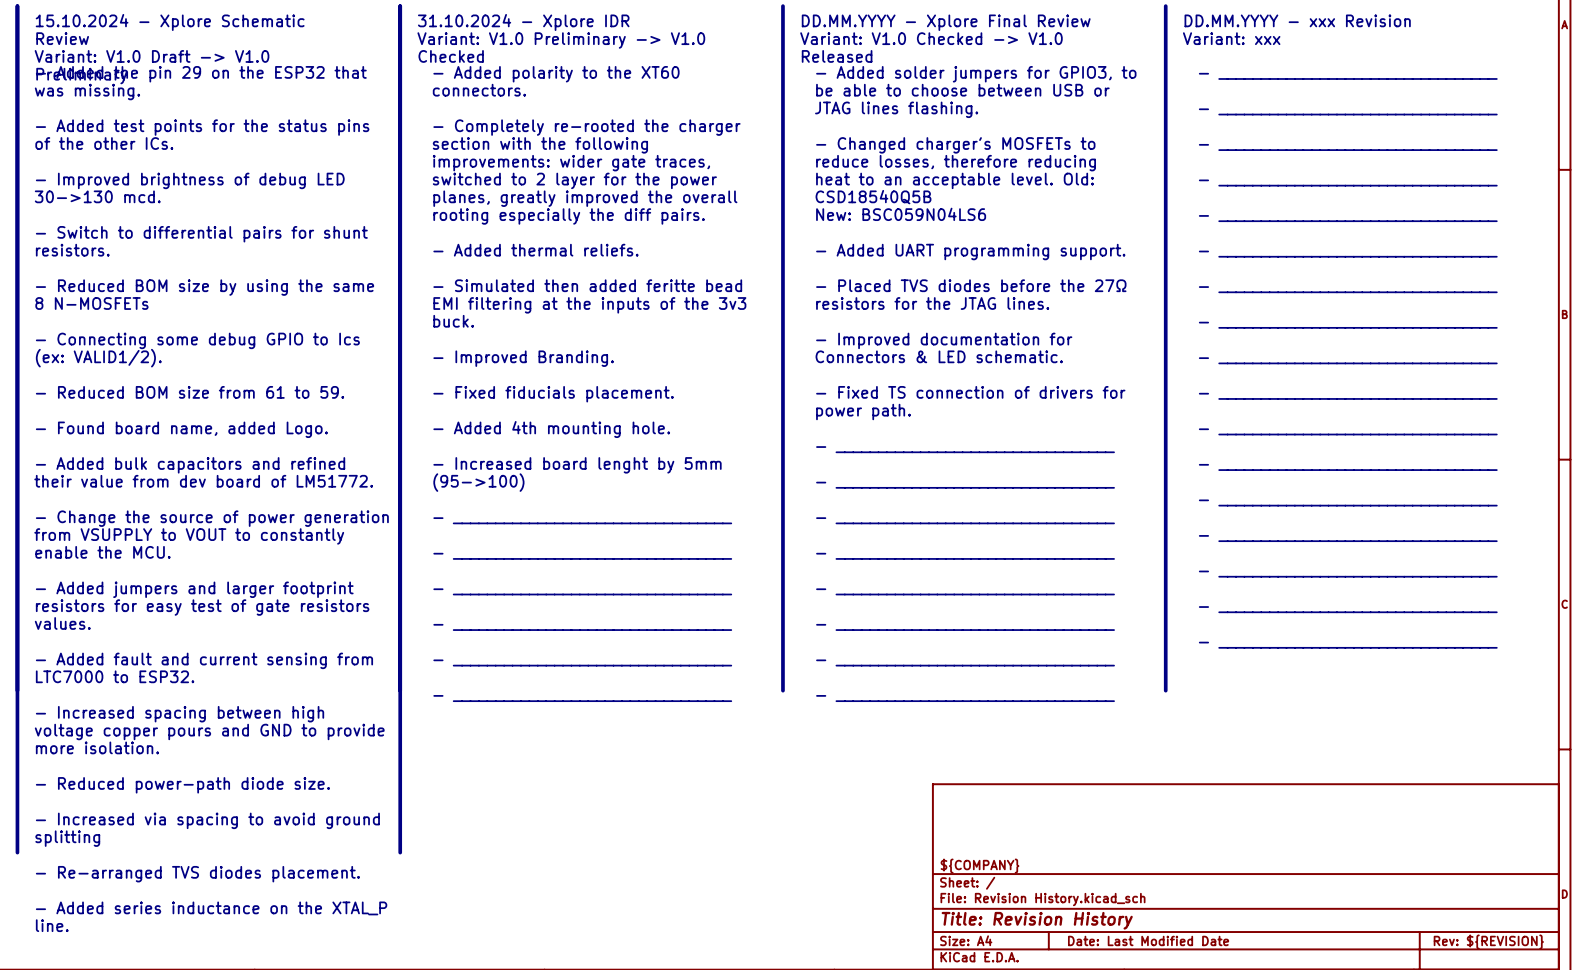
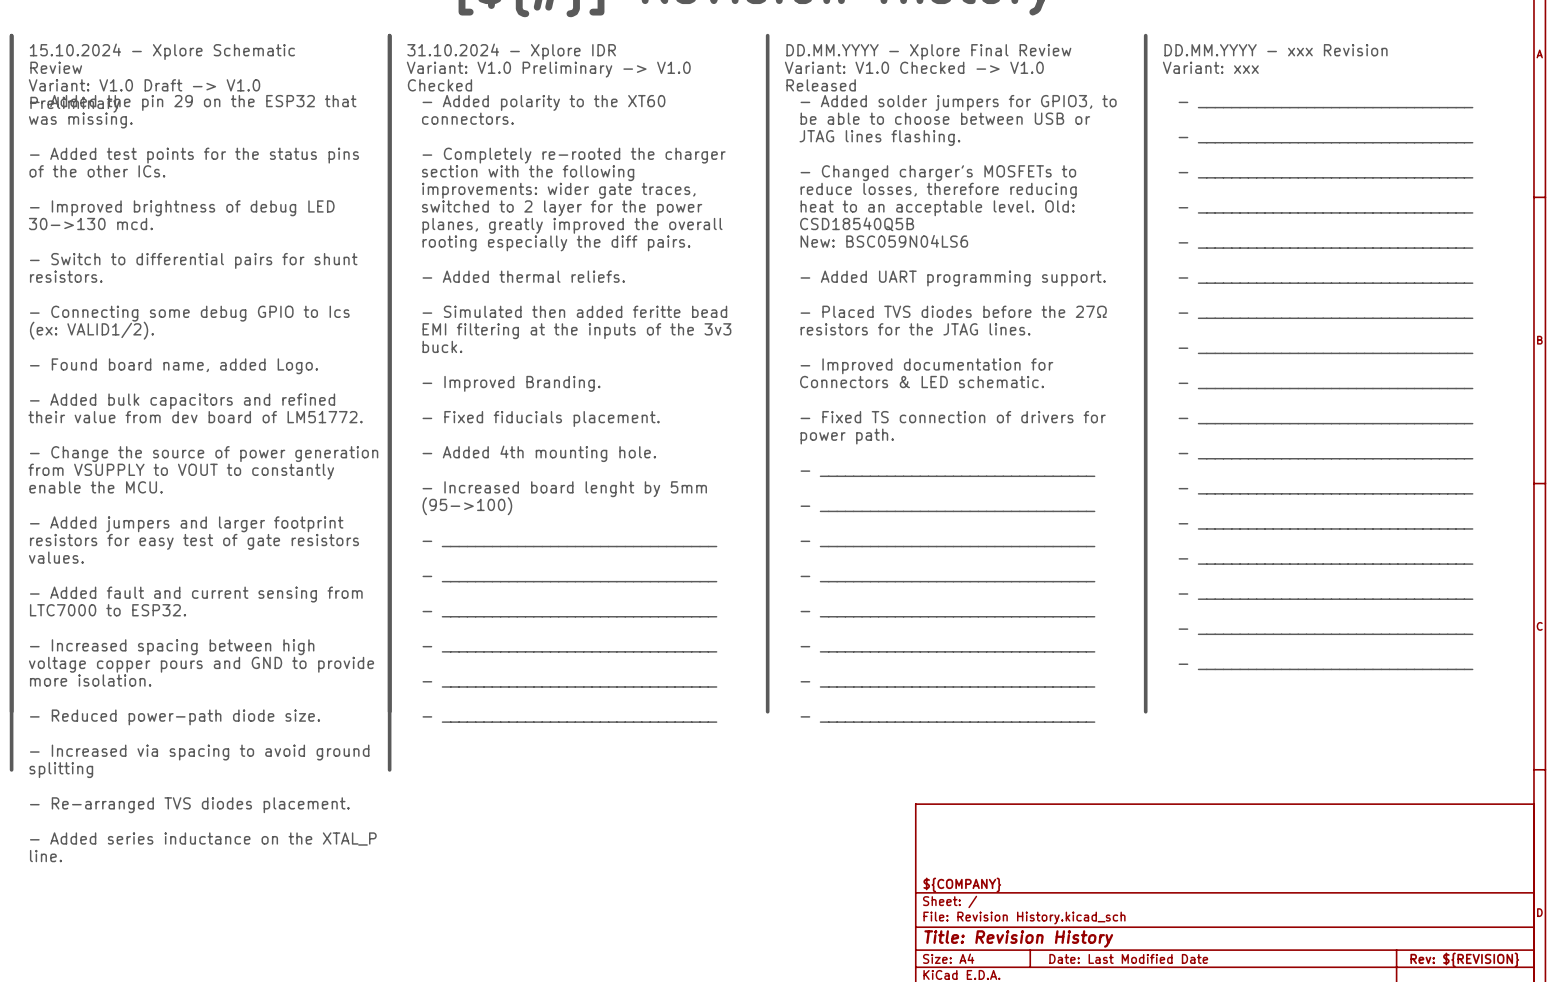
text: - Reduced BOM size by using the same (204, 287) -> - Connecting some debug GPIO to Ics (189, 313)
text: 8 N-MOSFETs (91, 303) -> (ex: VALID1/2). (91, 330)
text: - Connecting some debug GPIO to Ics (197, 340) -> - Found board name, added Logo. (173, 366)
text: (ex: VALID1/2). (98, 358) -> none
text: none -> - Added bulk capacitors and refined (182, 401)
text: - Reduced BOM size from 61 to 59. (190, 392) -> their value from dev board of LM51772. (195, 417)
text: - Found board name, added Logo. (181, 429) -> - Change the source of power generation (204, 454)
text: none -> from VSUPPLY to VOUT to constantly (181, 471)
text: - Added bulk capacitors and refined (190, 465) -> enable the MCU. (96, 487)
text: their value from dev board of LM51772. (203, 481) -> none
text: none -> - Added jumpers and larger footprint (186, 524)
text: - Change the source of power generation (212, 518) -> resistors for easy test of gate resistors (194, 541)
text: from VSUPPLY to VOUT to constantly (189, 536) -> values. (56, 557)
text: enable the MCU. (102, 552) -> none
text: none -> - Added fault and current sensing from (196, 594)
text: - Added jumpers and larger footprint (194, 589) -> LTC7000 to ESP32. (108, 610)
text: resistors for easy test of gate resistors (202, 607) -> none
text: values. (62, 623) -> - Increased spacing between high (172, 647)
text: none -> voltage copper pours and GND to provide (201, 664)
text: - Added fault and current sensing from (204, 660) -> more isolation. (90, 680)
text: LTC7000 to ESP32. (115, 676) -> none
text: none -> - Reduced power-path diode size. (175, 717)
text: - Increased spacing between high (180, 714) -> none
text: voltage copper pours and GND to provide (209, 731) -> - Increased via spacing to avoid ground (199, 752)
text: more isolation. (97, 747) -> splitting (61, 770)
line: (17, 749) (17, 852) -> none
line: (400, 749) (400, 852) -> none
text: - Reduced power-path diode size. (182, 785) -> - Re-arranged TVS diodes placement. (189, 805)
text: - Increased via spacing to avoid ground (207, 820) -> - Added series inductance on the XTAL_P (203, 839)
text: splitting (67, 838) -> line. (45, 856)
text: - Re-arranged TVS diodes placement. (197, 874) -> none
text: - Added series inductance on the XTAL_P (211, 908) -> none
text: line. (52, 925) -> none

